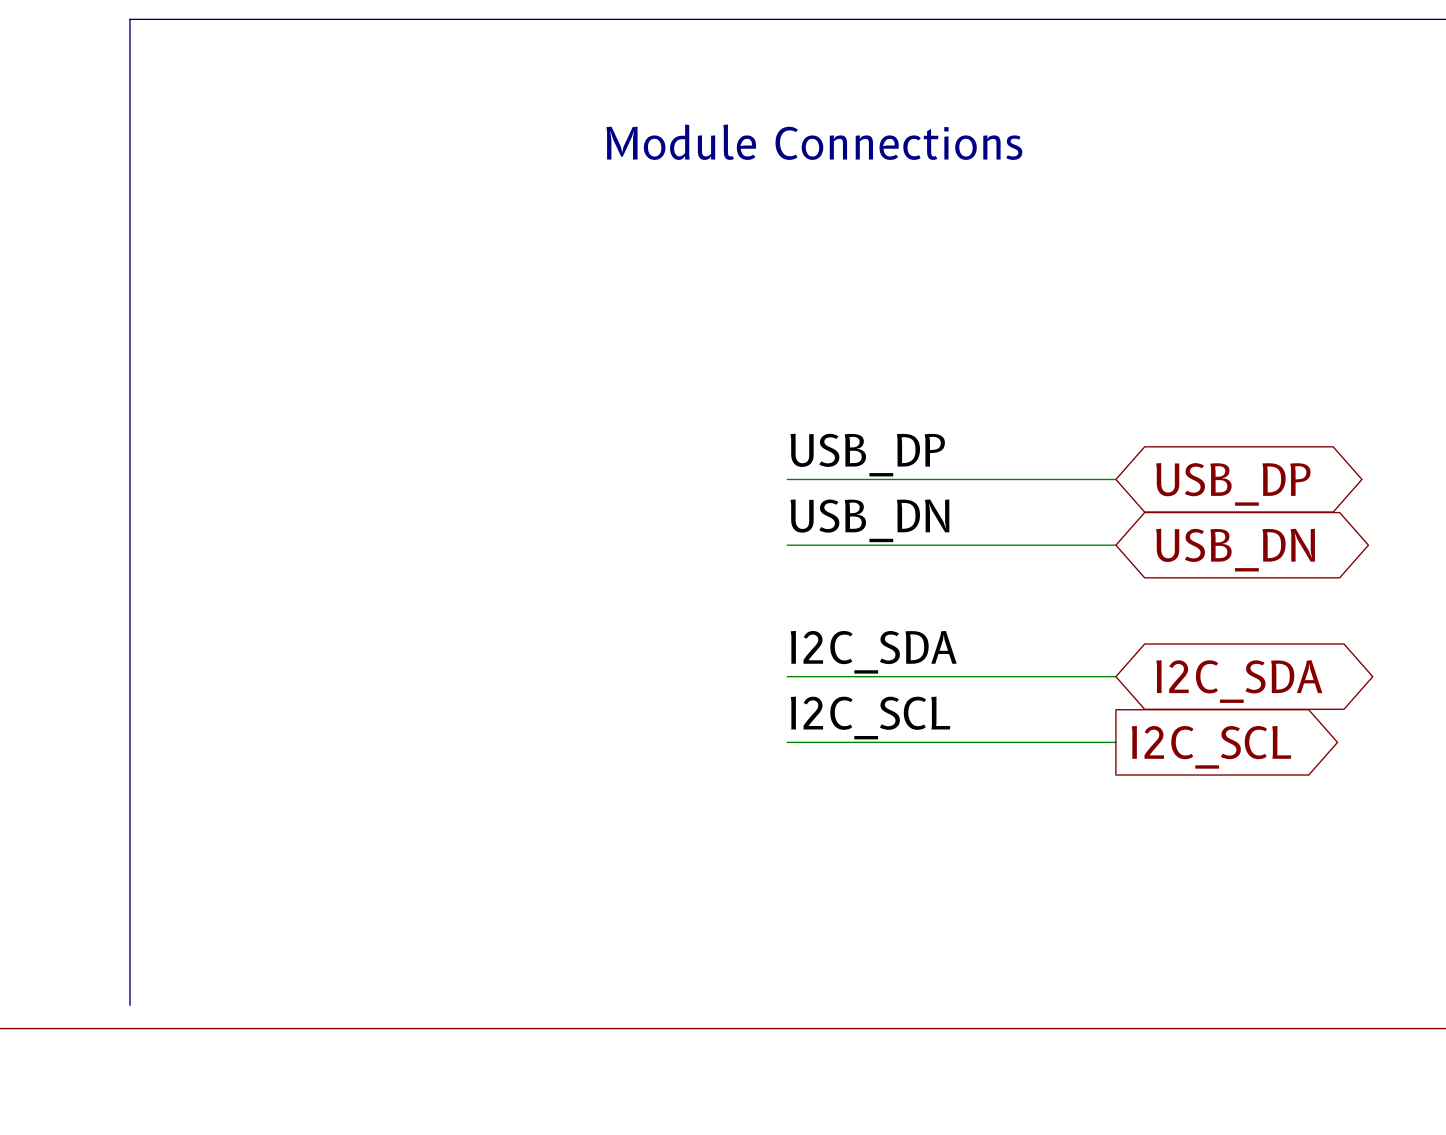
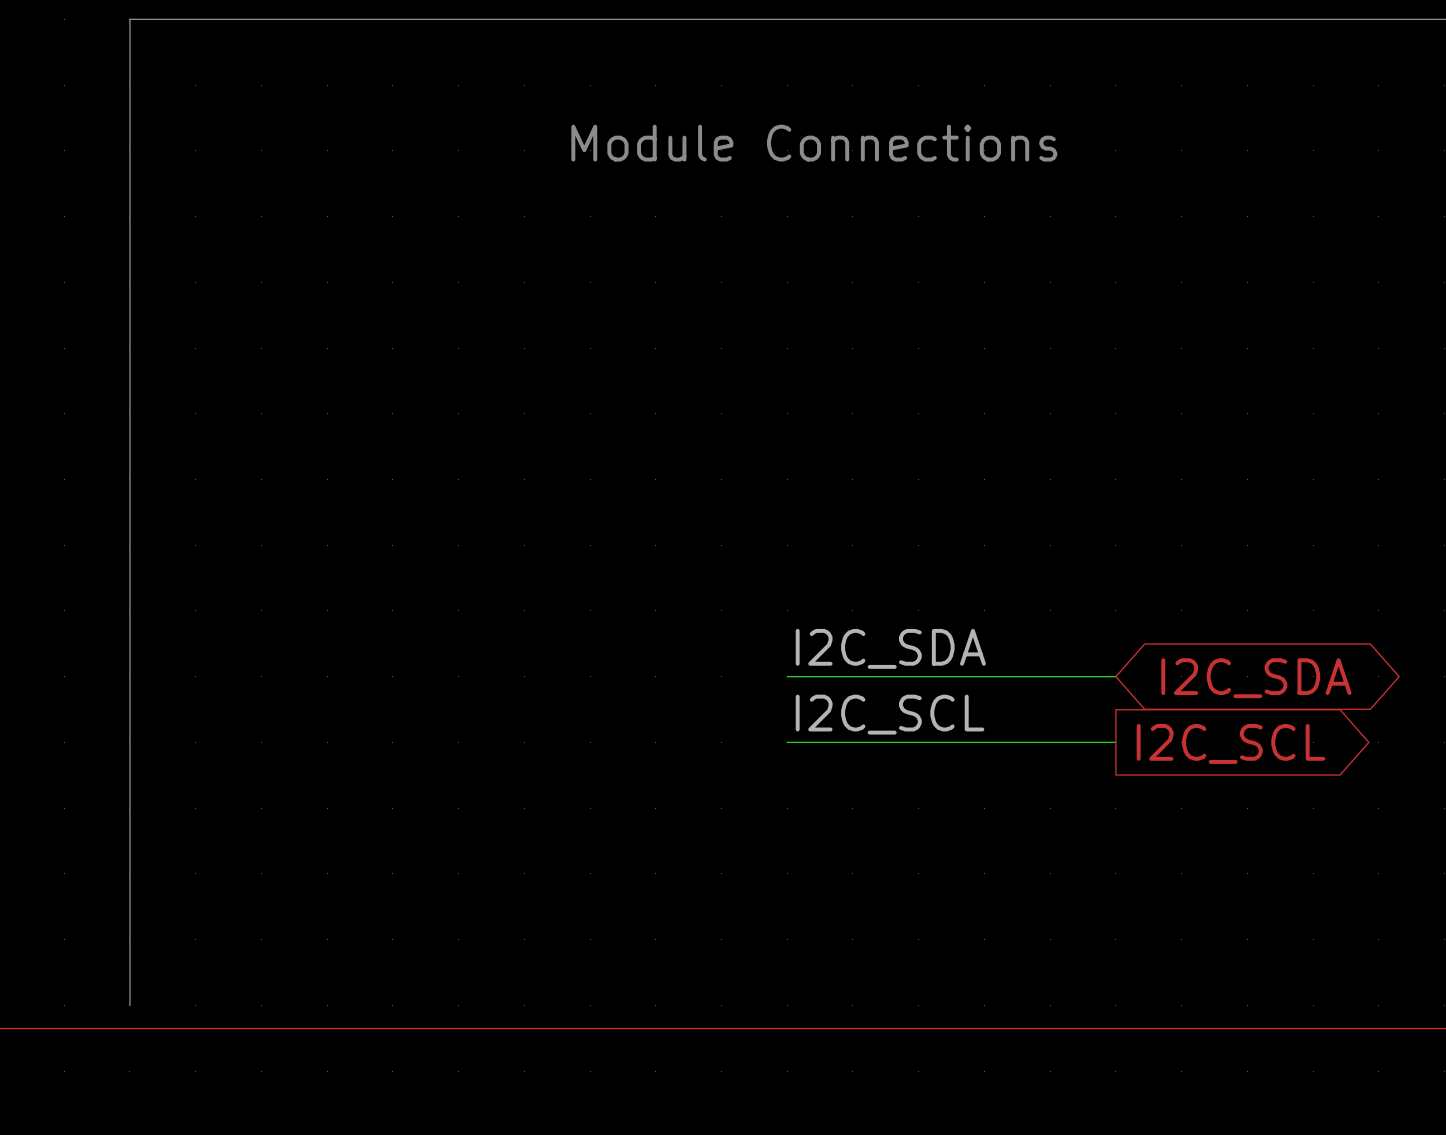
label: USB_DP (867, 455) -> none
wire: (787, 479) (1115, 479) -> none
global label: USB_DP (1233, 484) -> none
label: USB_DN (869, 520) -> none
wire: (787, 545) (1115, 545) -> none
global label: USB_DN (1235, 550) -> none

